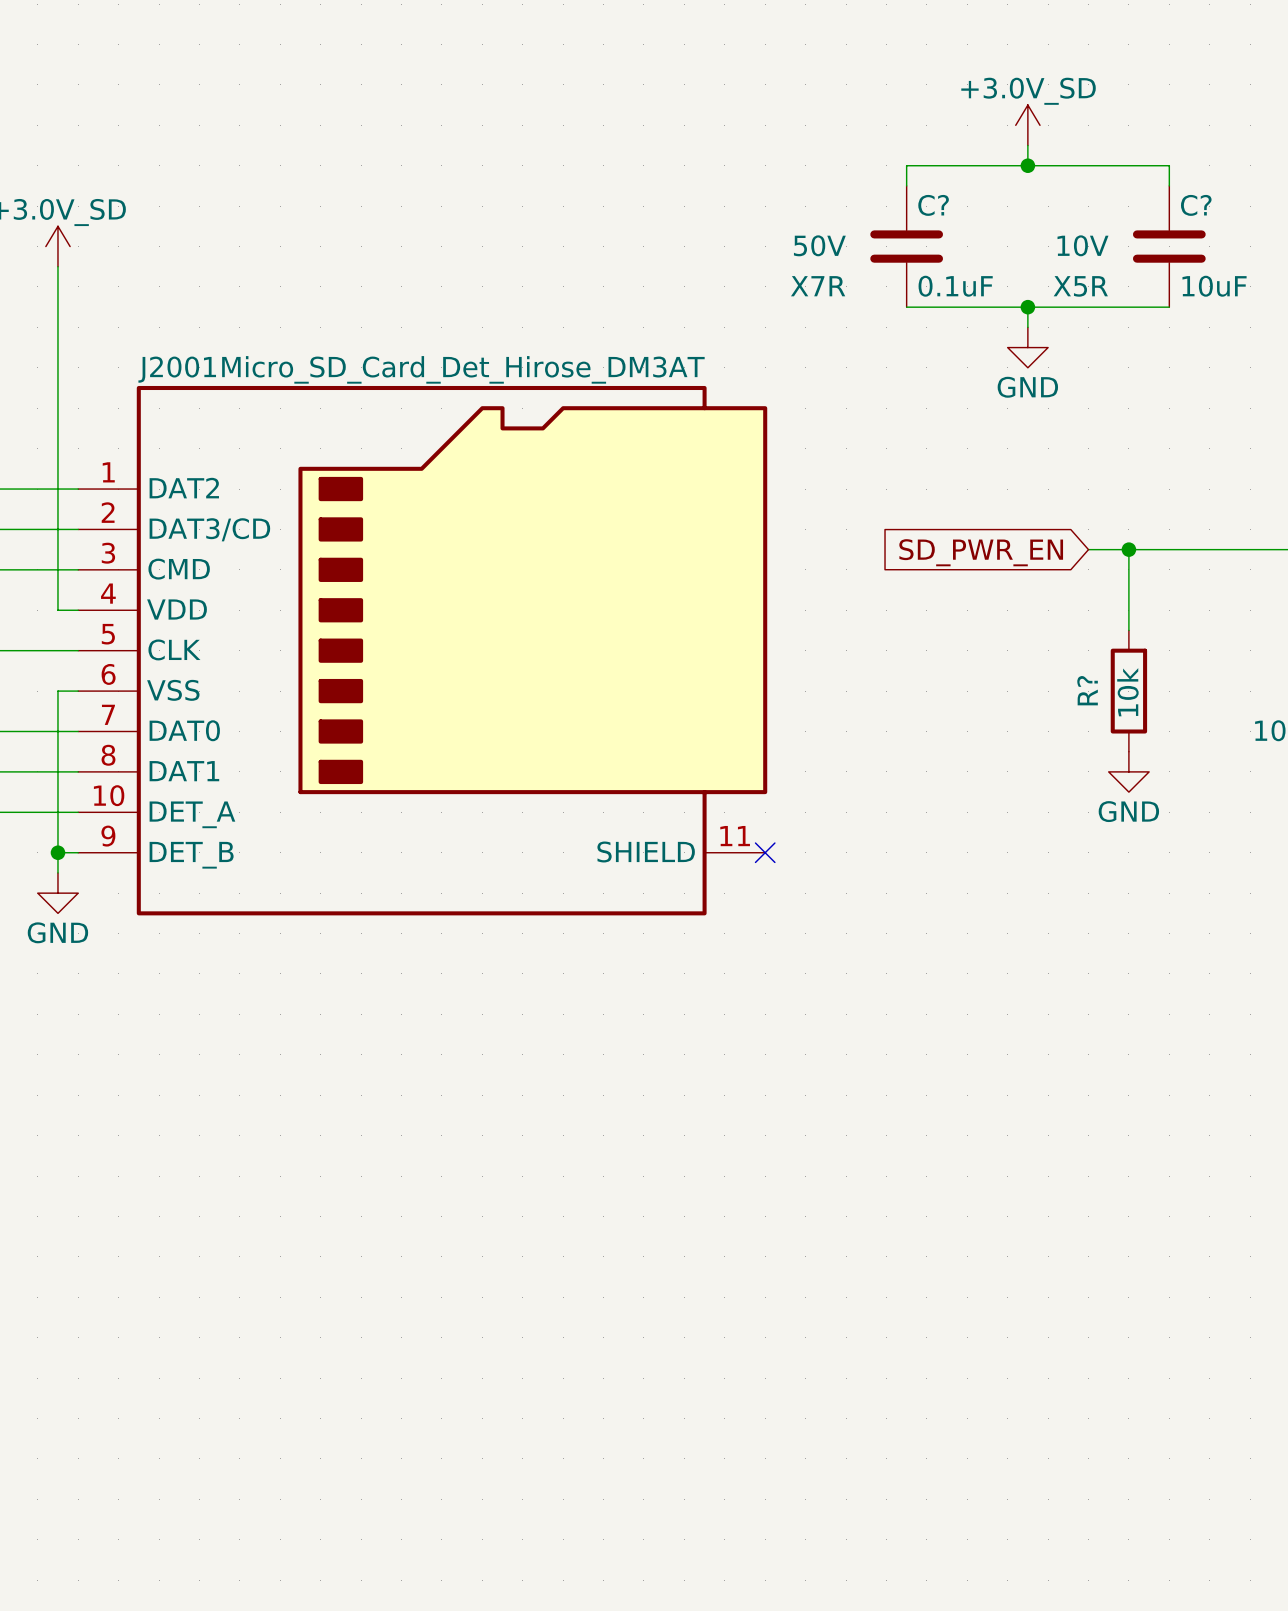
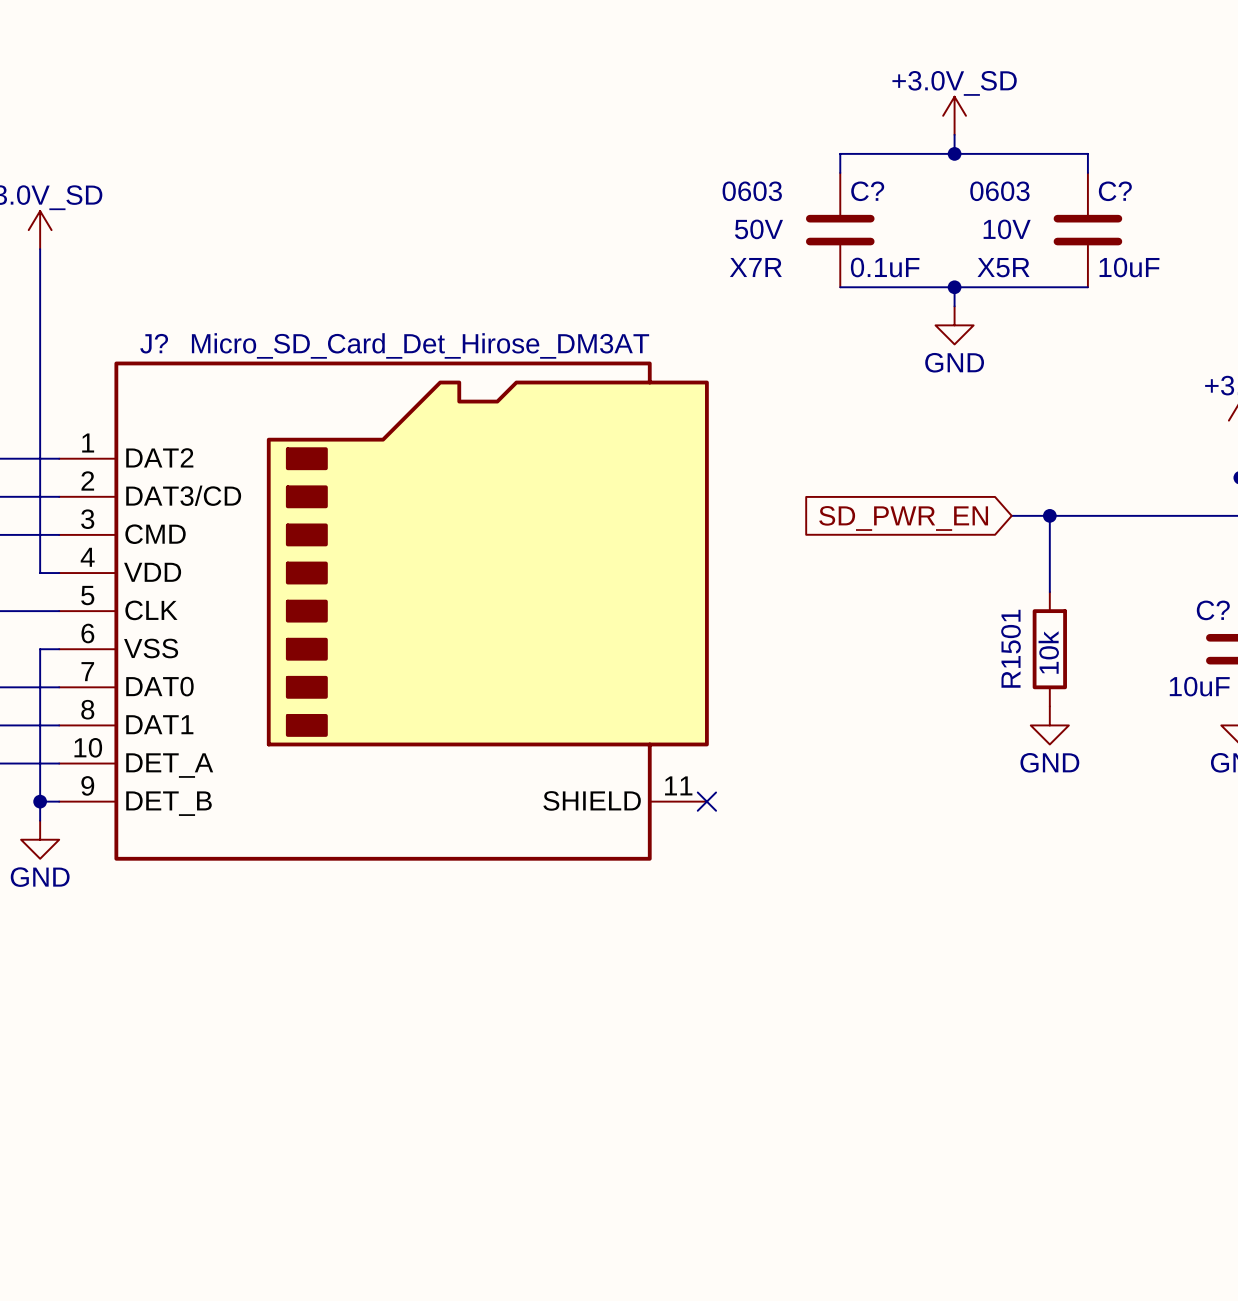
C? text: none -> 0603 (752, 191)
C? text: none -> 0603 (999, 191)
J2001 name: J2001 (177, 369) -> J? (154, 343)
R? name: R? (1087, 690) -> R1501 (1011, 648)

